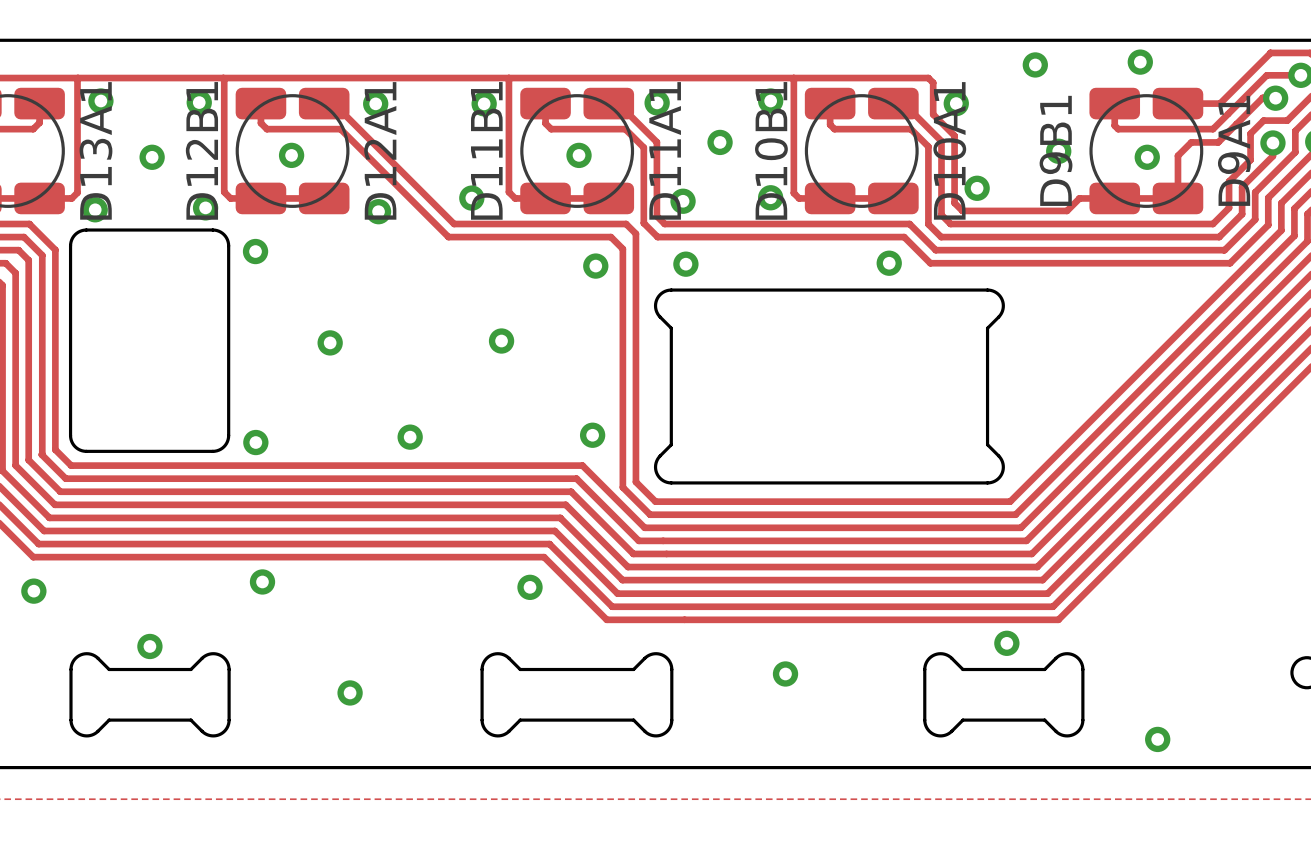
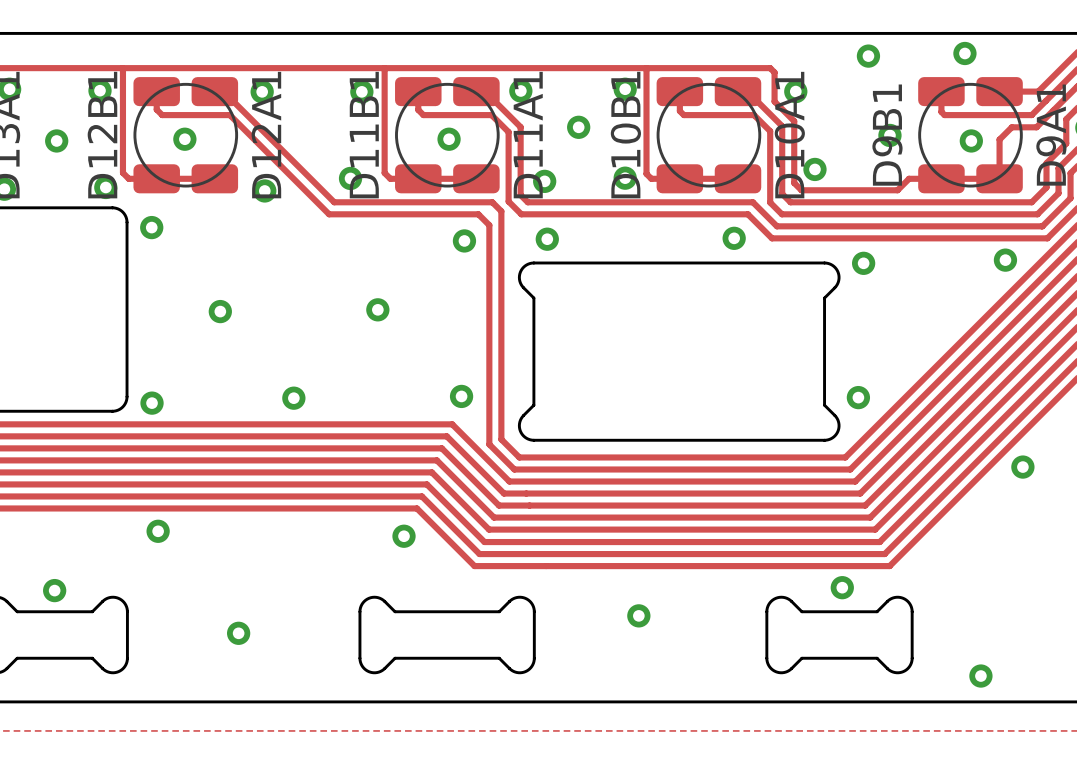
via: none -> (1005, 260)
via: none -> (863, 263)
via: none -> (858, 397)
via: none -> (1022, 467)

